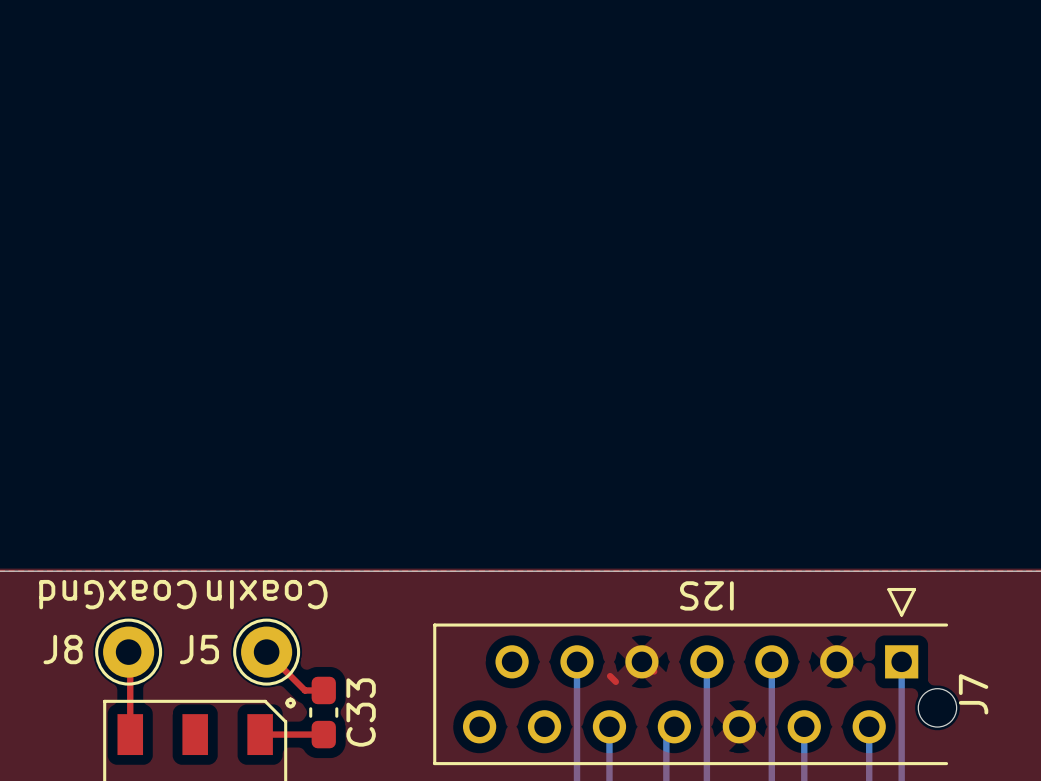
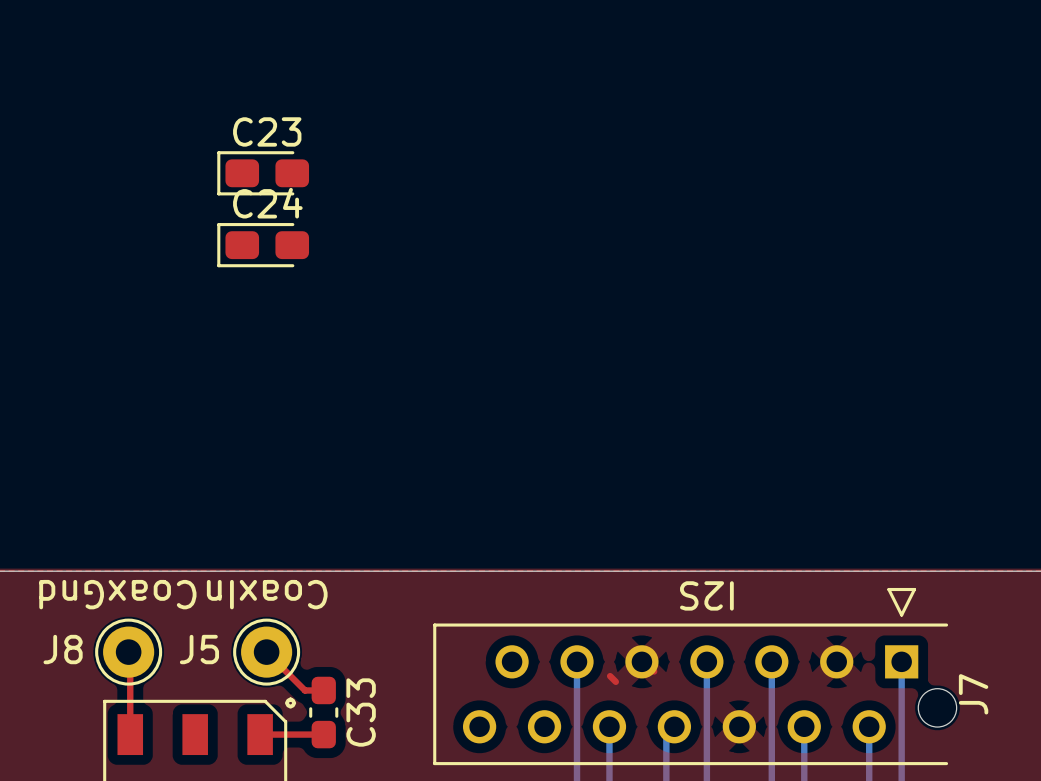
C23: none -> (263, 173)
C24: none -> (263, 245)

